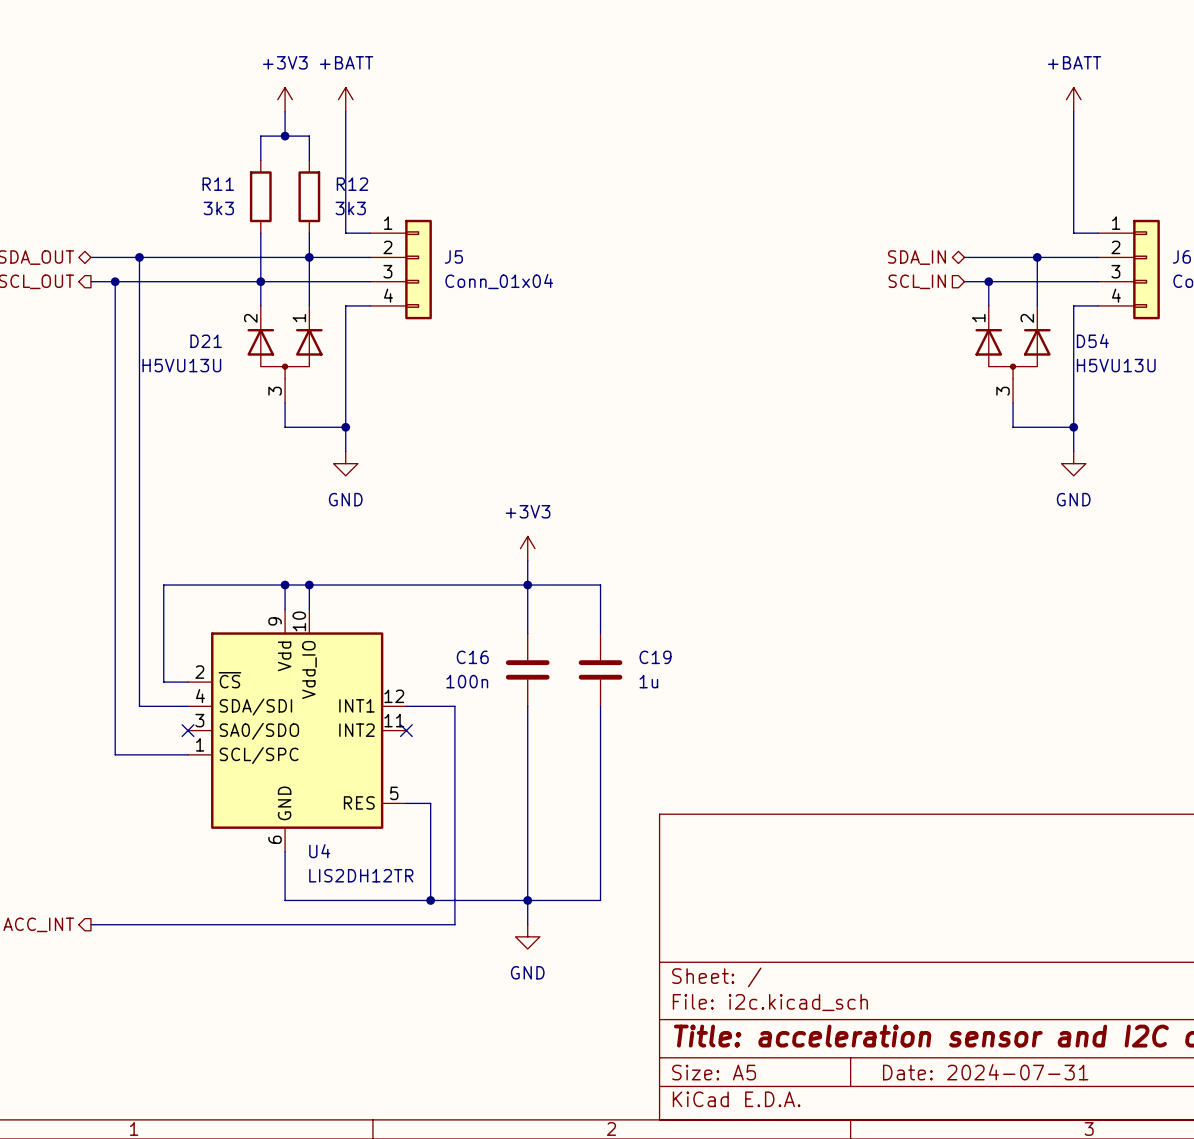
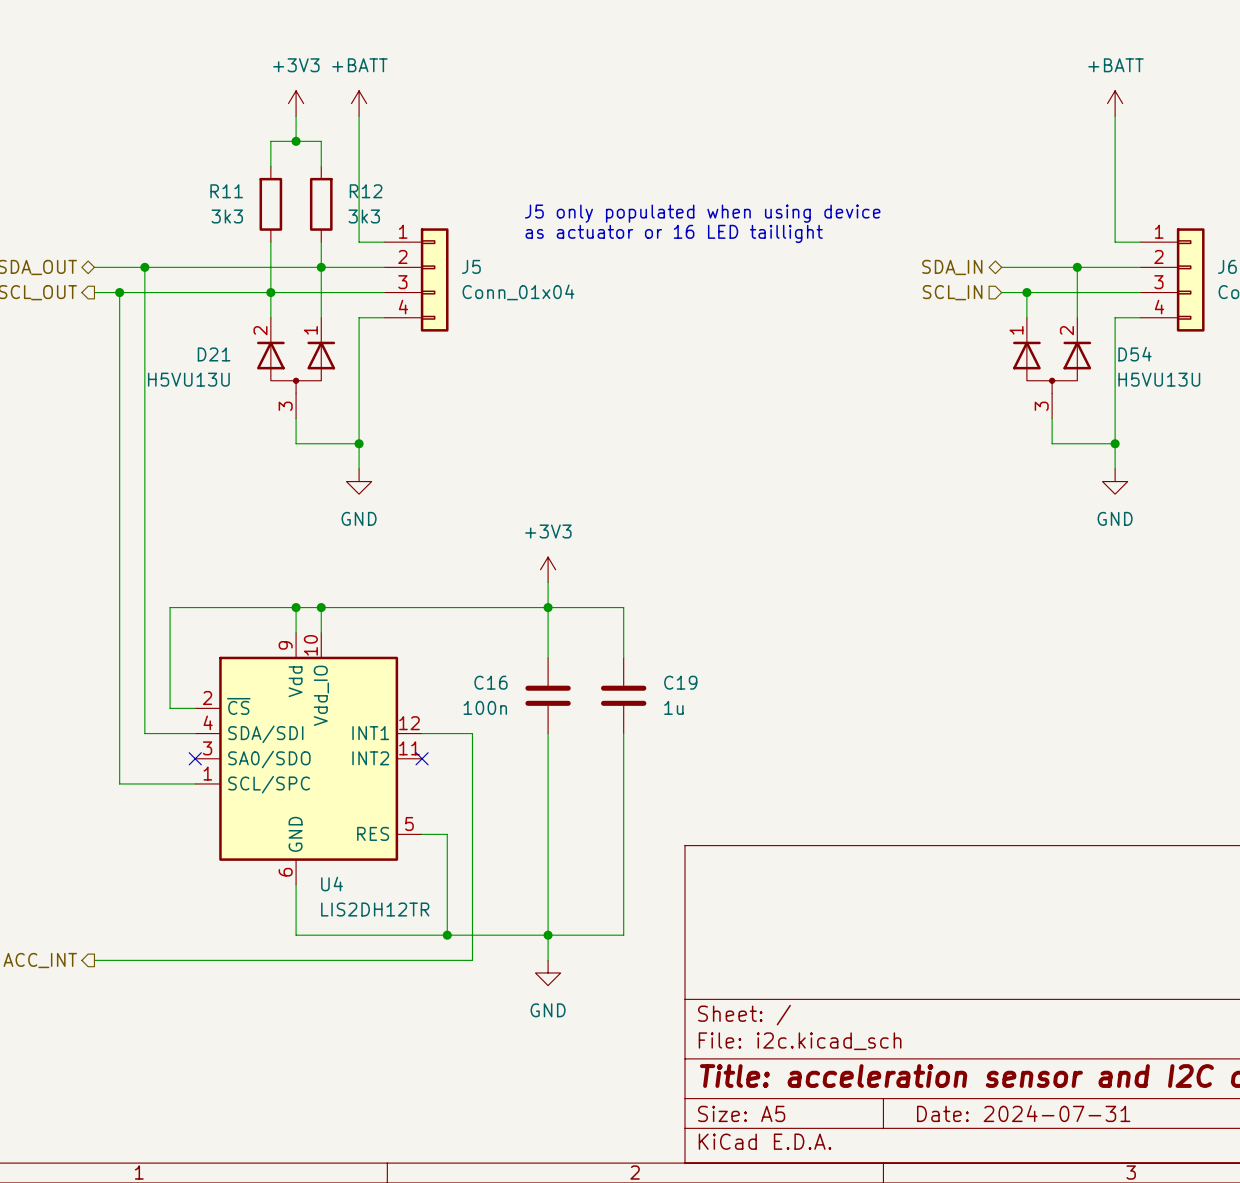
text: none -> J5 only populated when using device (702, 213)
text: none -> as actuator or 16 LED taillight (674, 233)

